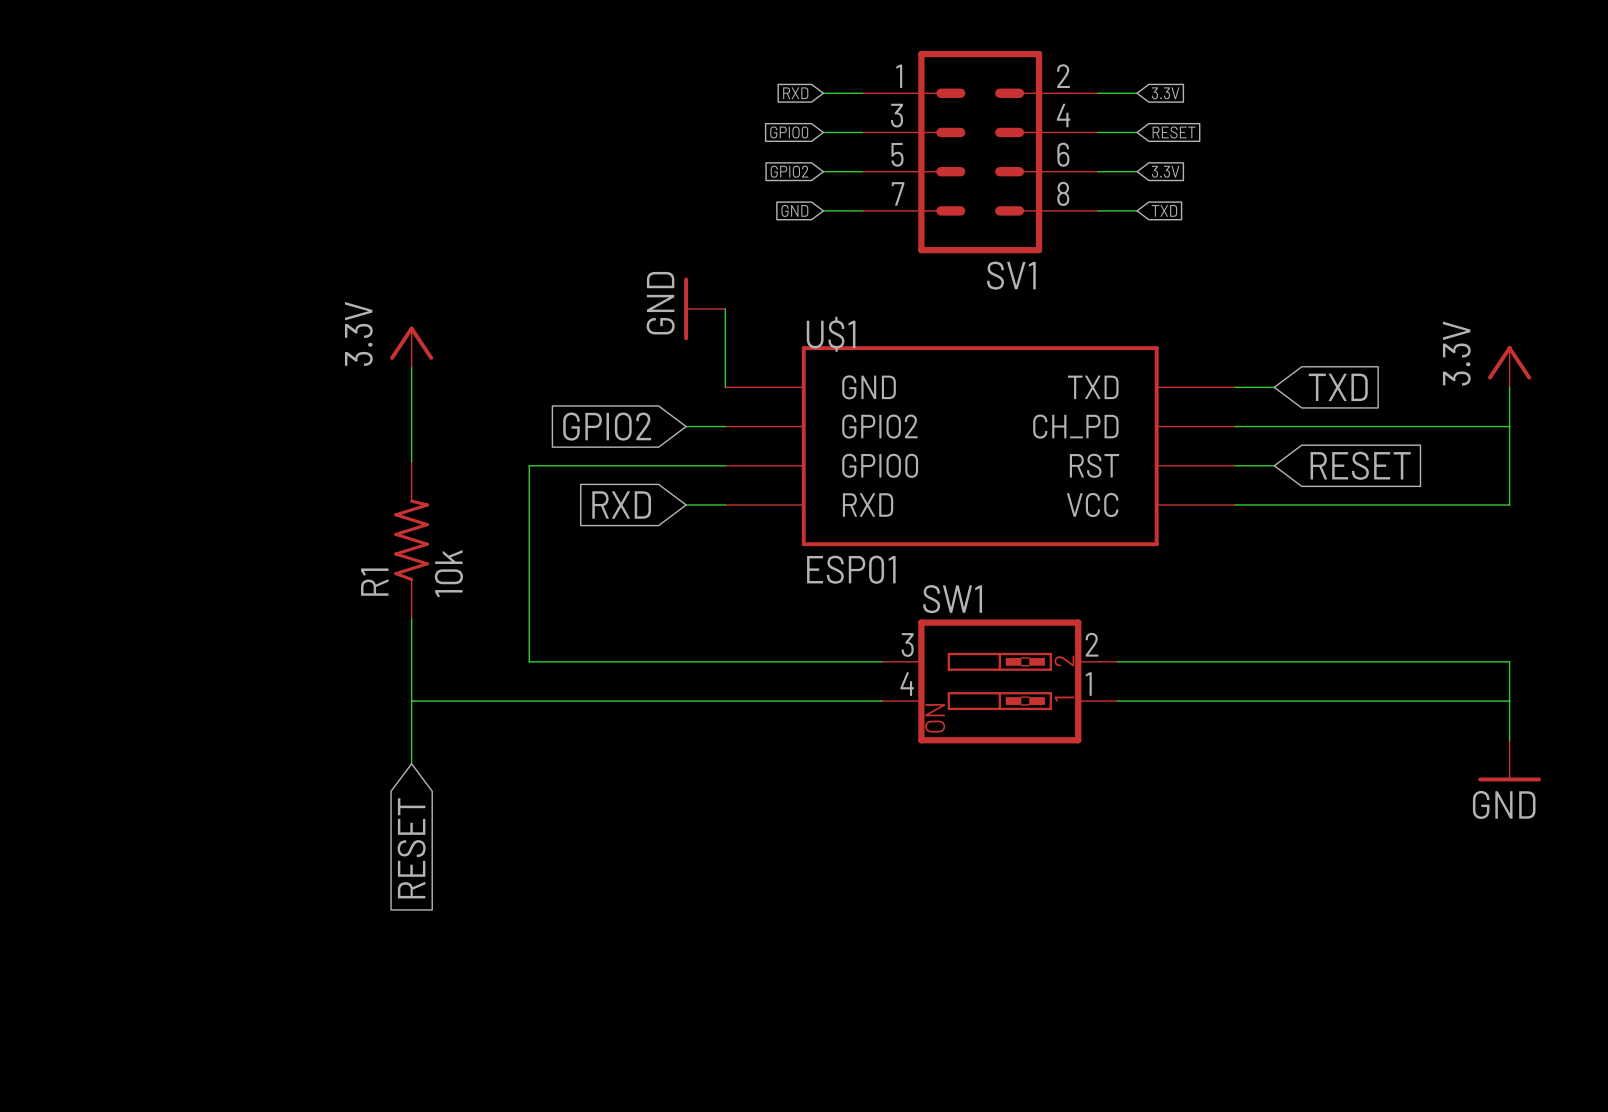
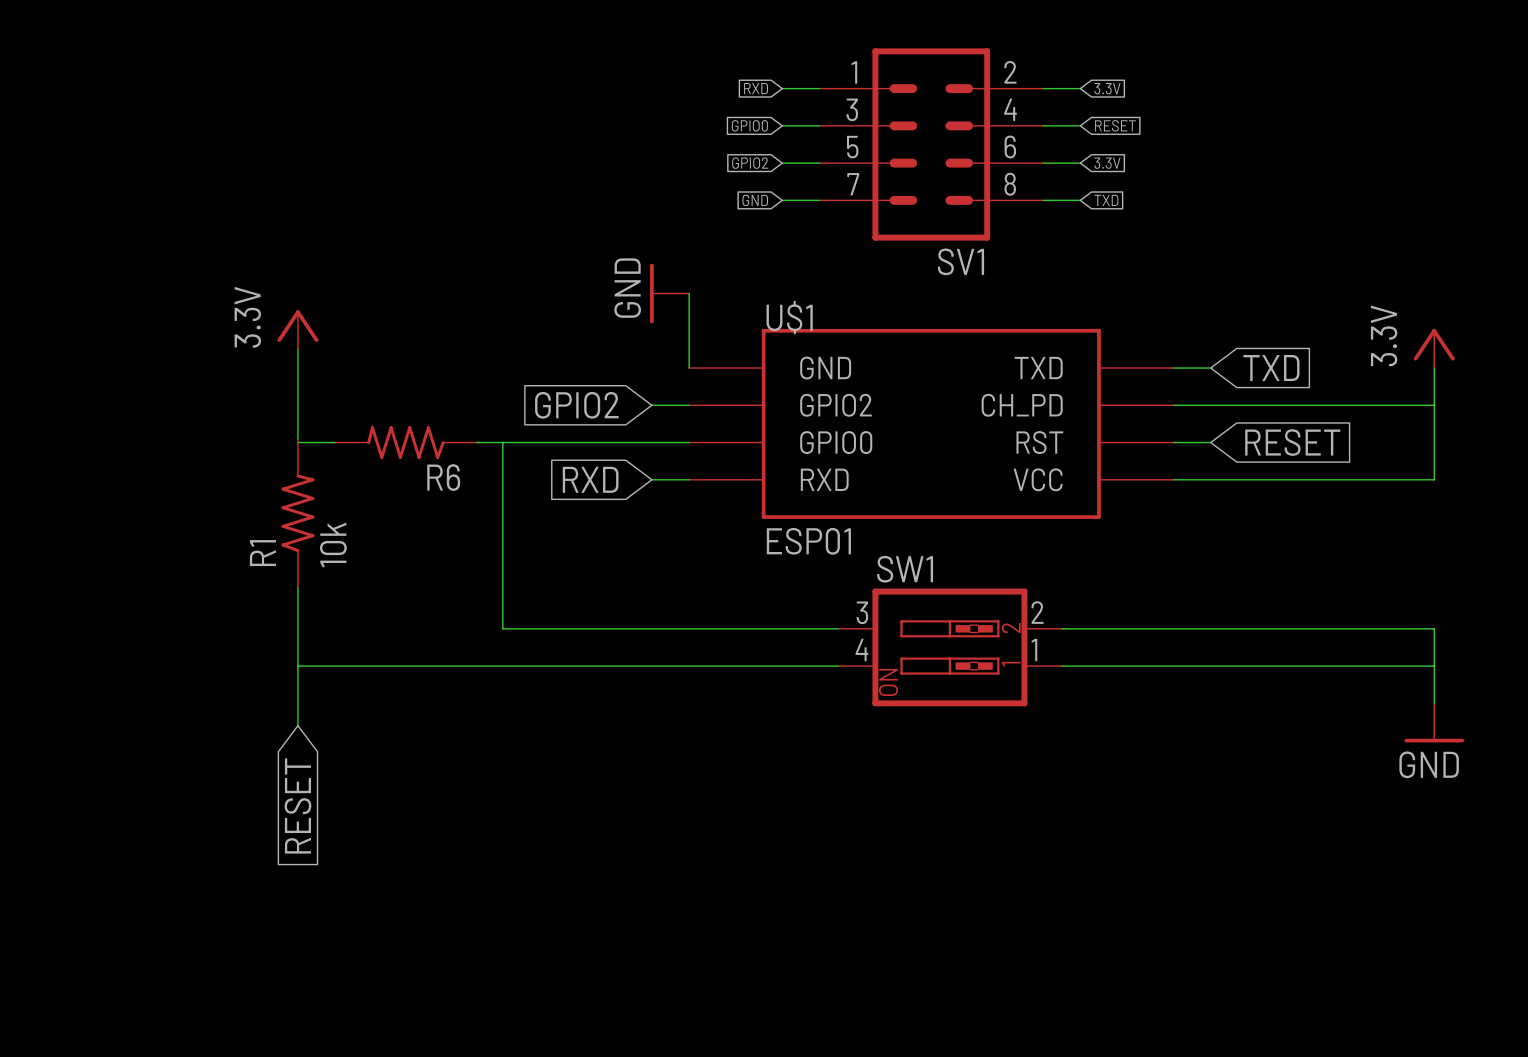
power symbol position: 3.3V (411, 347) -> 3.3V (297, 329)
wire: (411, 367) (411, 461) -> (297, 349) (297, 438)
wire: none -> (297, 442) (335, 442)
R6: none -> (405, 442)
wire: none -> (476, 442) (502, 442)
R1 position: (411, 540) -> (297, 513)
wire: (411, 618) (411, 763) -> (297, 587) (297, 725)
wire: none -> (297, 666) (391, 666)
global label position: RESET (411, 848) -> RESET (297, 806)

